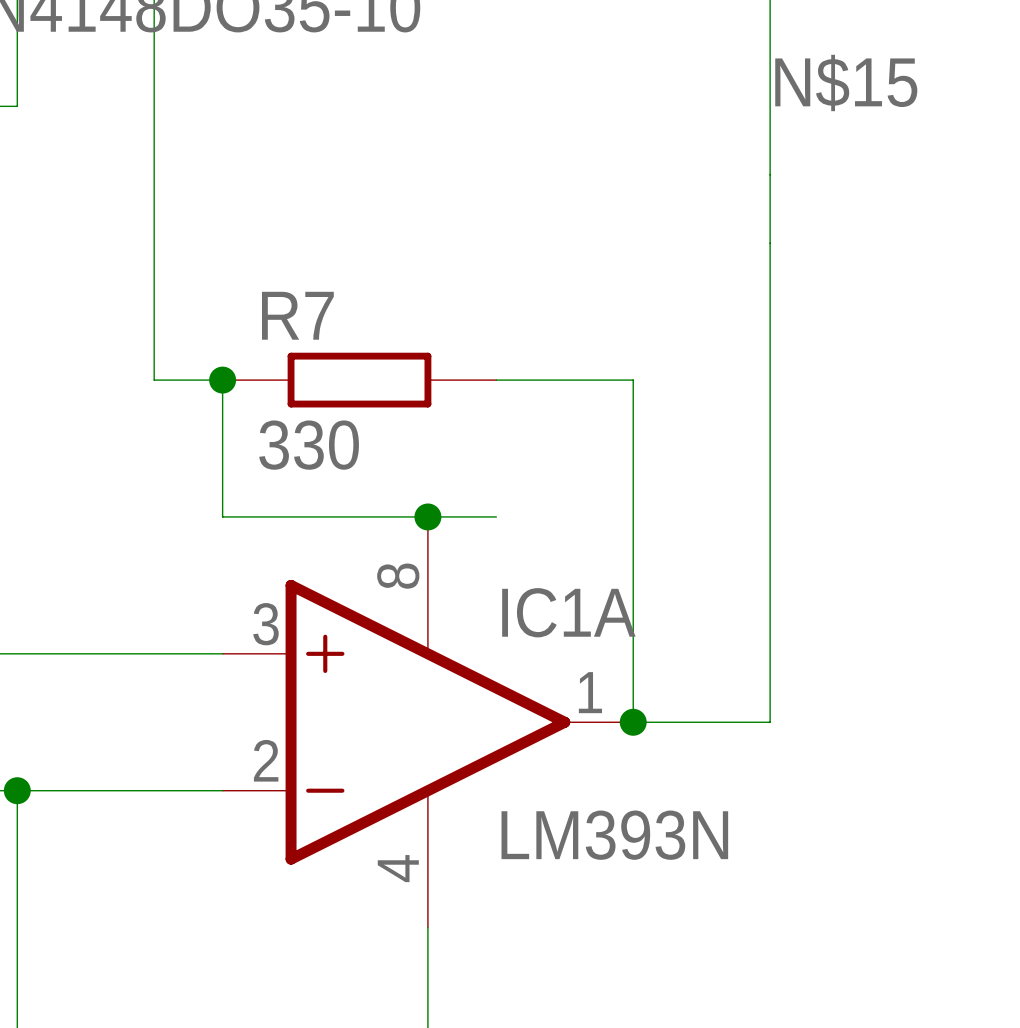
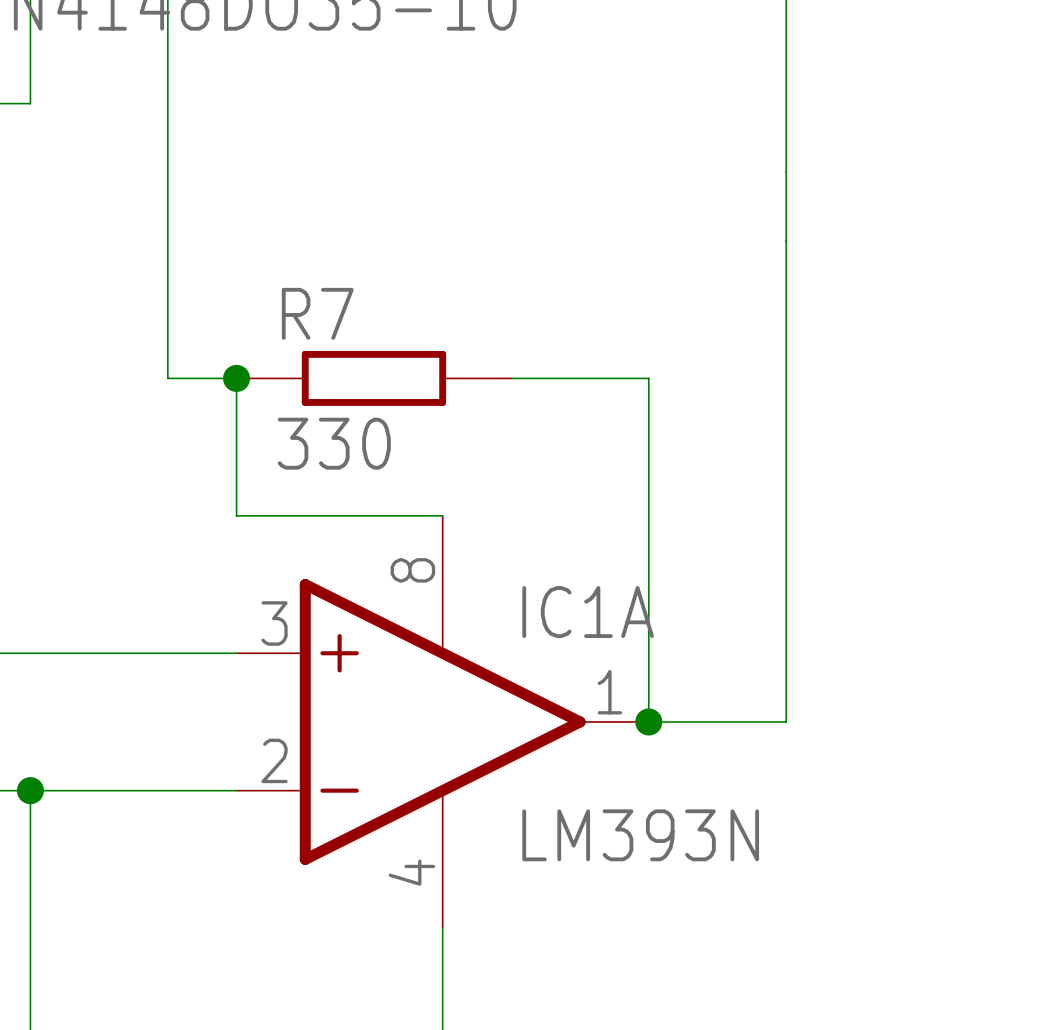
label: N$15 (846, 82) -> none
wire: (427, 516) (496, 516) -> none
junction: (427, 516) -> none

